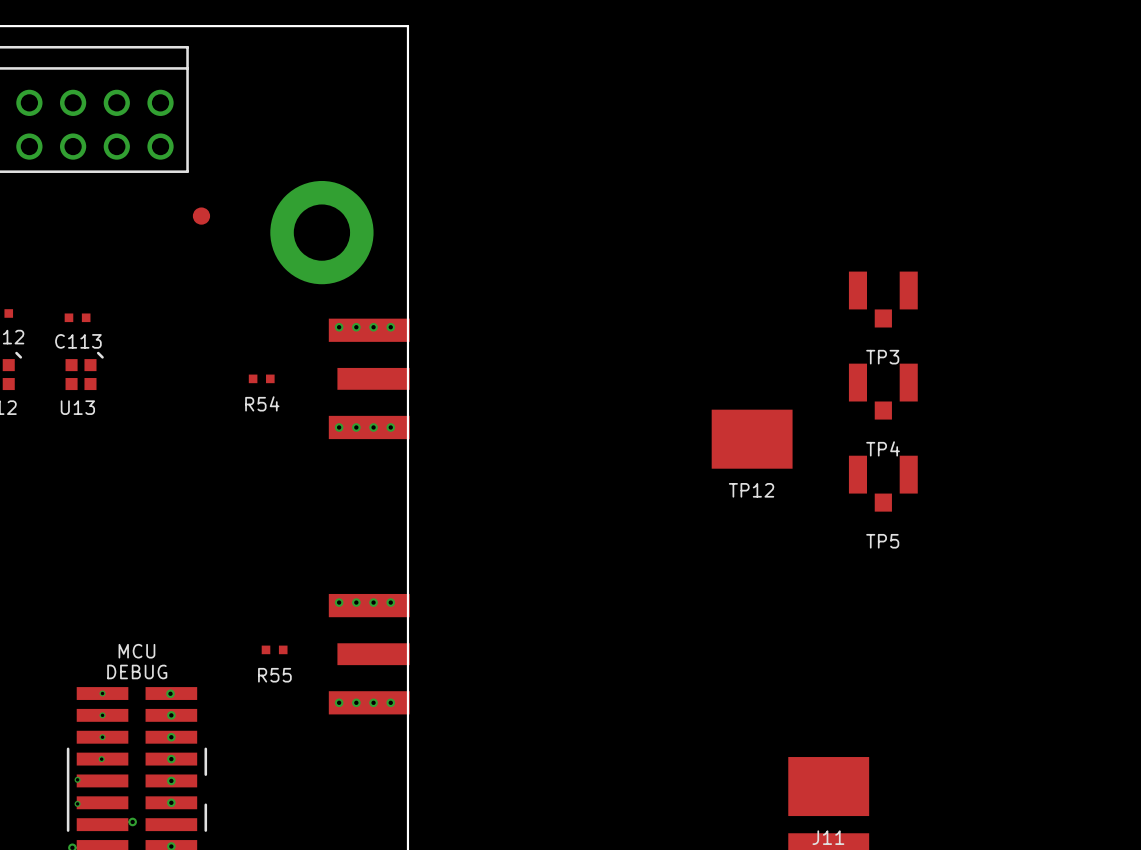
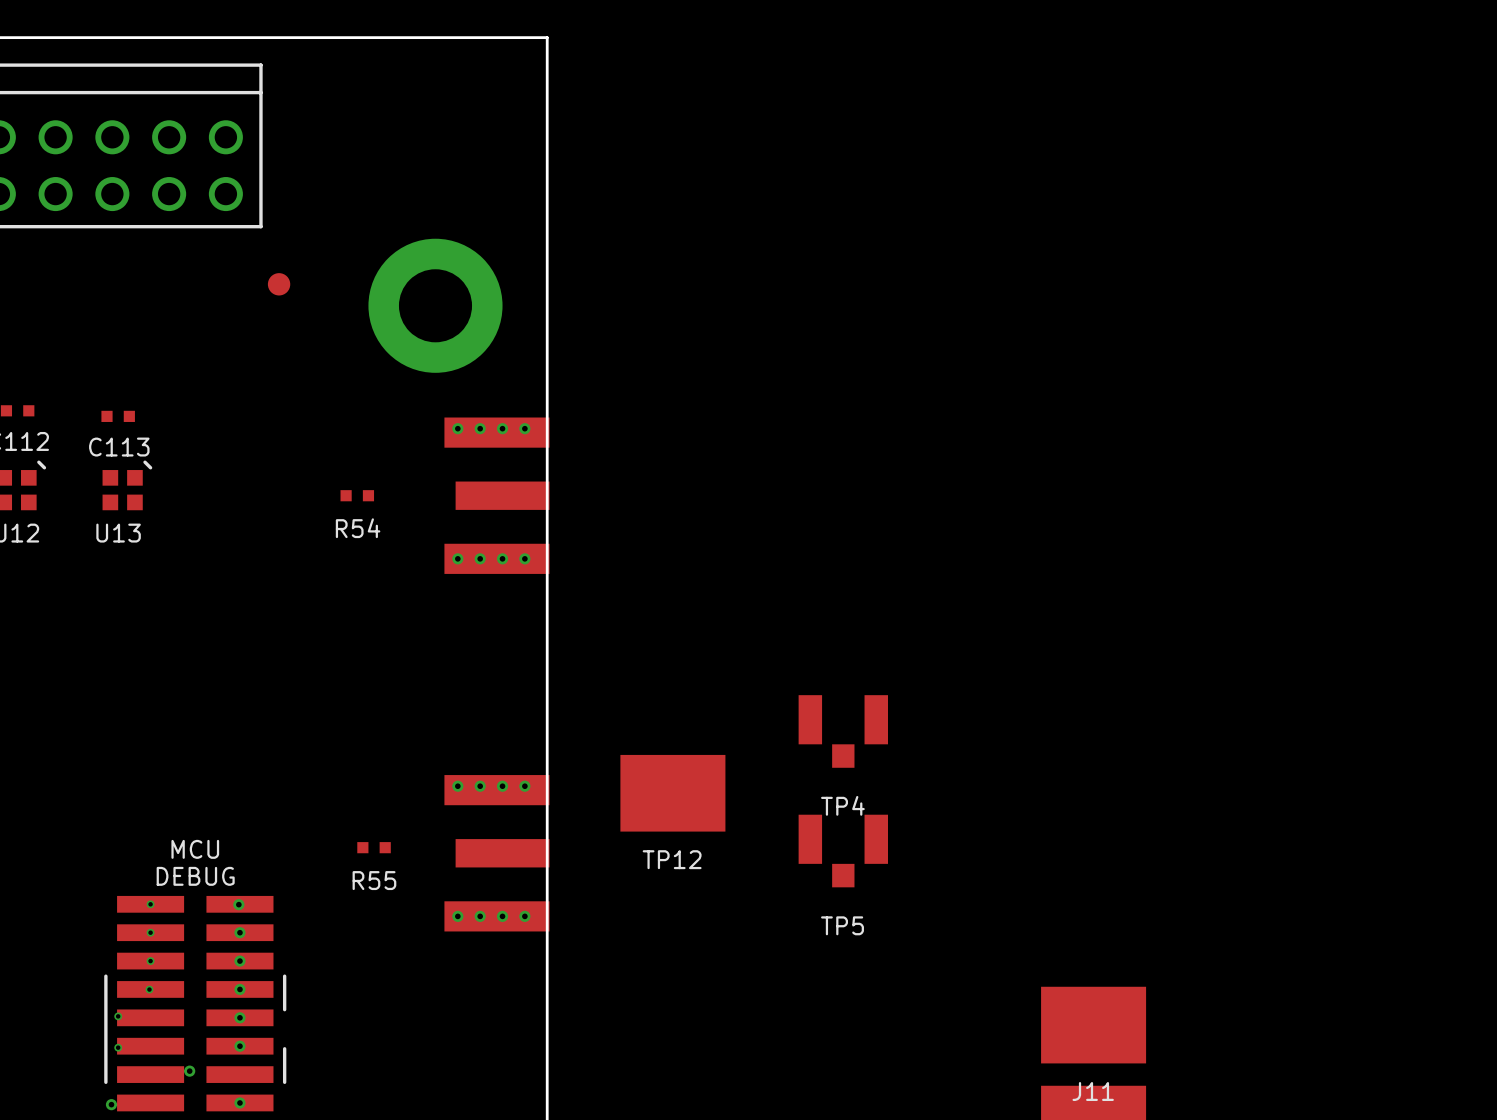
TP3: (883, 299) -> none
TP4 position: (883, 391) -> (843, 731)
TP12 position: (752, 439) -> (672, 793)
TP5 position: (883, 483) -> (843, 851)

